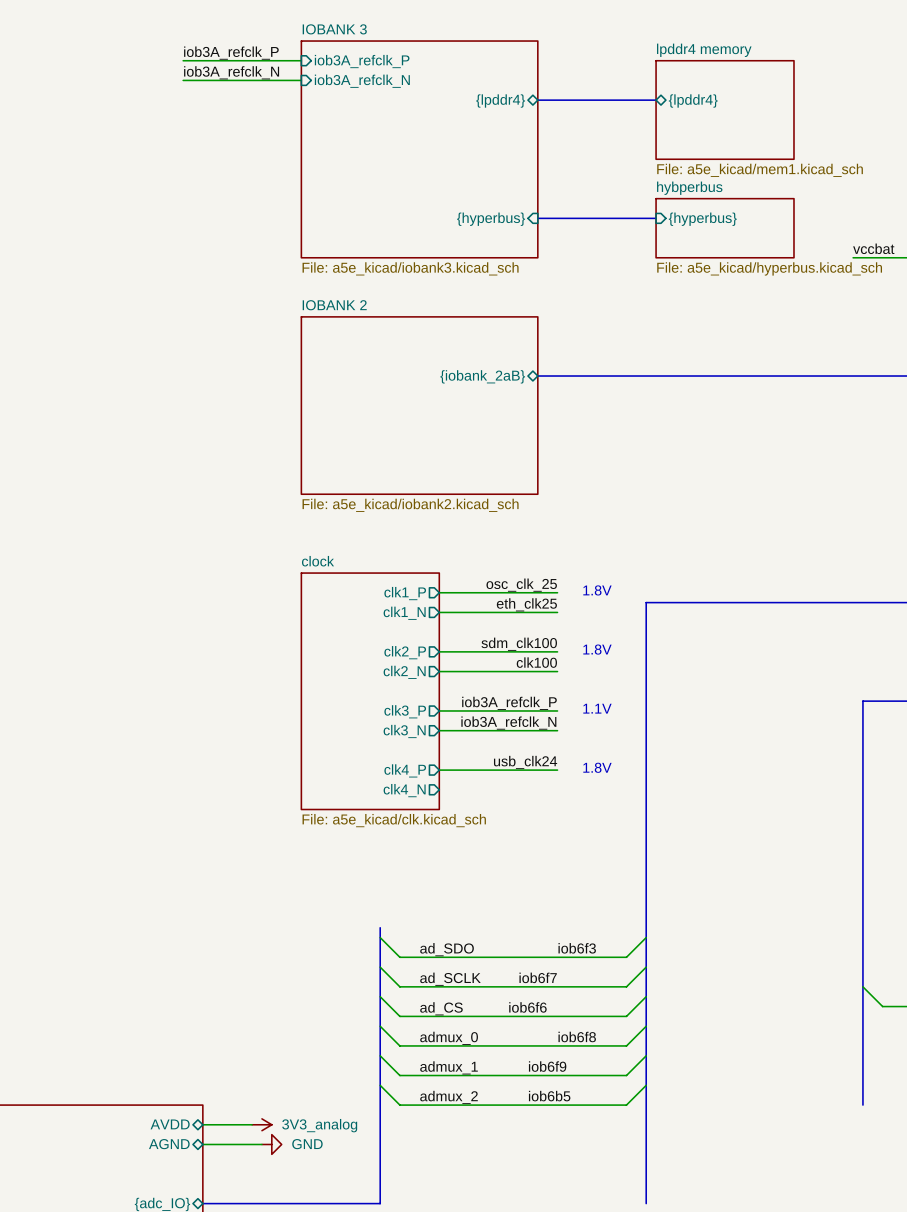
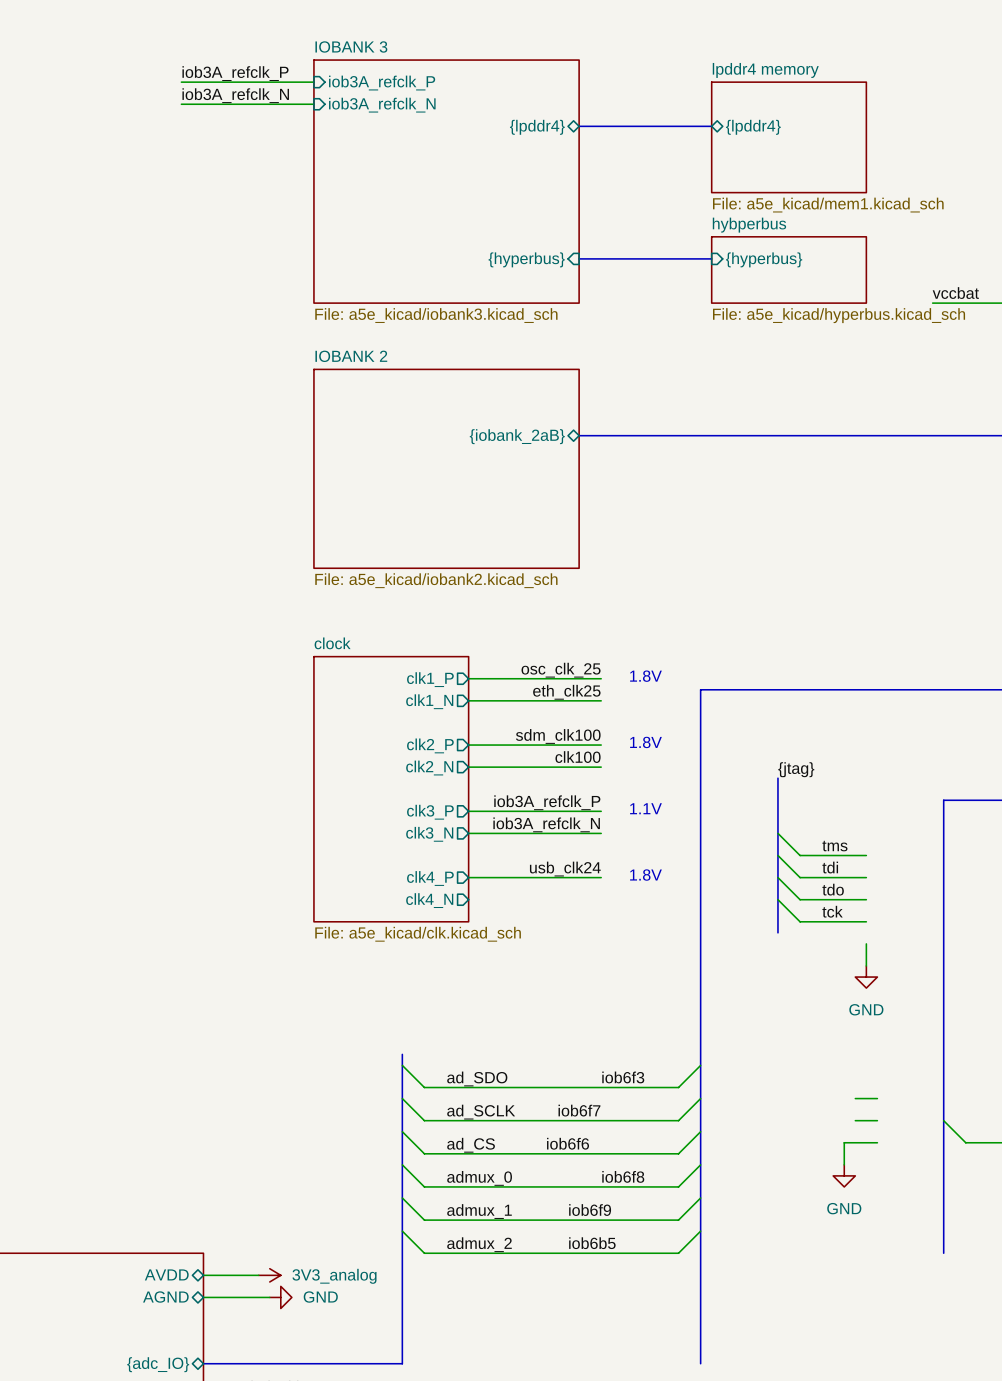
label: none -> {jtag} (796, 769)
bus: none -> (777, 778) (777, 932)
wire: none -> (777, 833) (800, 855) (866, 855)
label: none -> tms (834, 846)
wire: none -> (777, 855) (800, 877) (866, 877)
label: none -> tdi (830, 867)
wire: none -> (777, 877) (800, 899) (866, 899)
label: none -> tdo (833, 889)
wire: none -> (777, 899) (800, 921) (866, 921)
label: none -> tck (832, 911)
wire: none -> (866, 943) (866, 966)
power symbol: none -> GND (866, 977)
wire: none -> (855, 1098) (877, 1098)
wire: none -> (855, 1120) (877, 1120)
wire: none -> (877, 1142) (844, 1142) (844, 1164)
power symbol: none -> GND (844, 1175)

